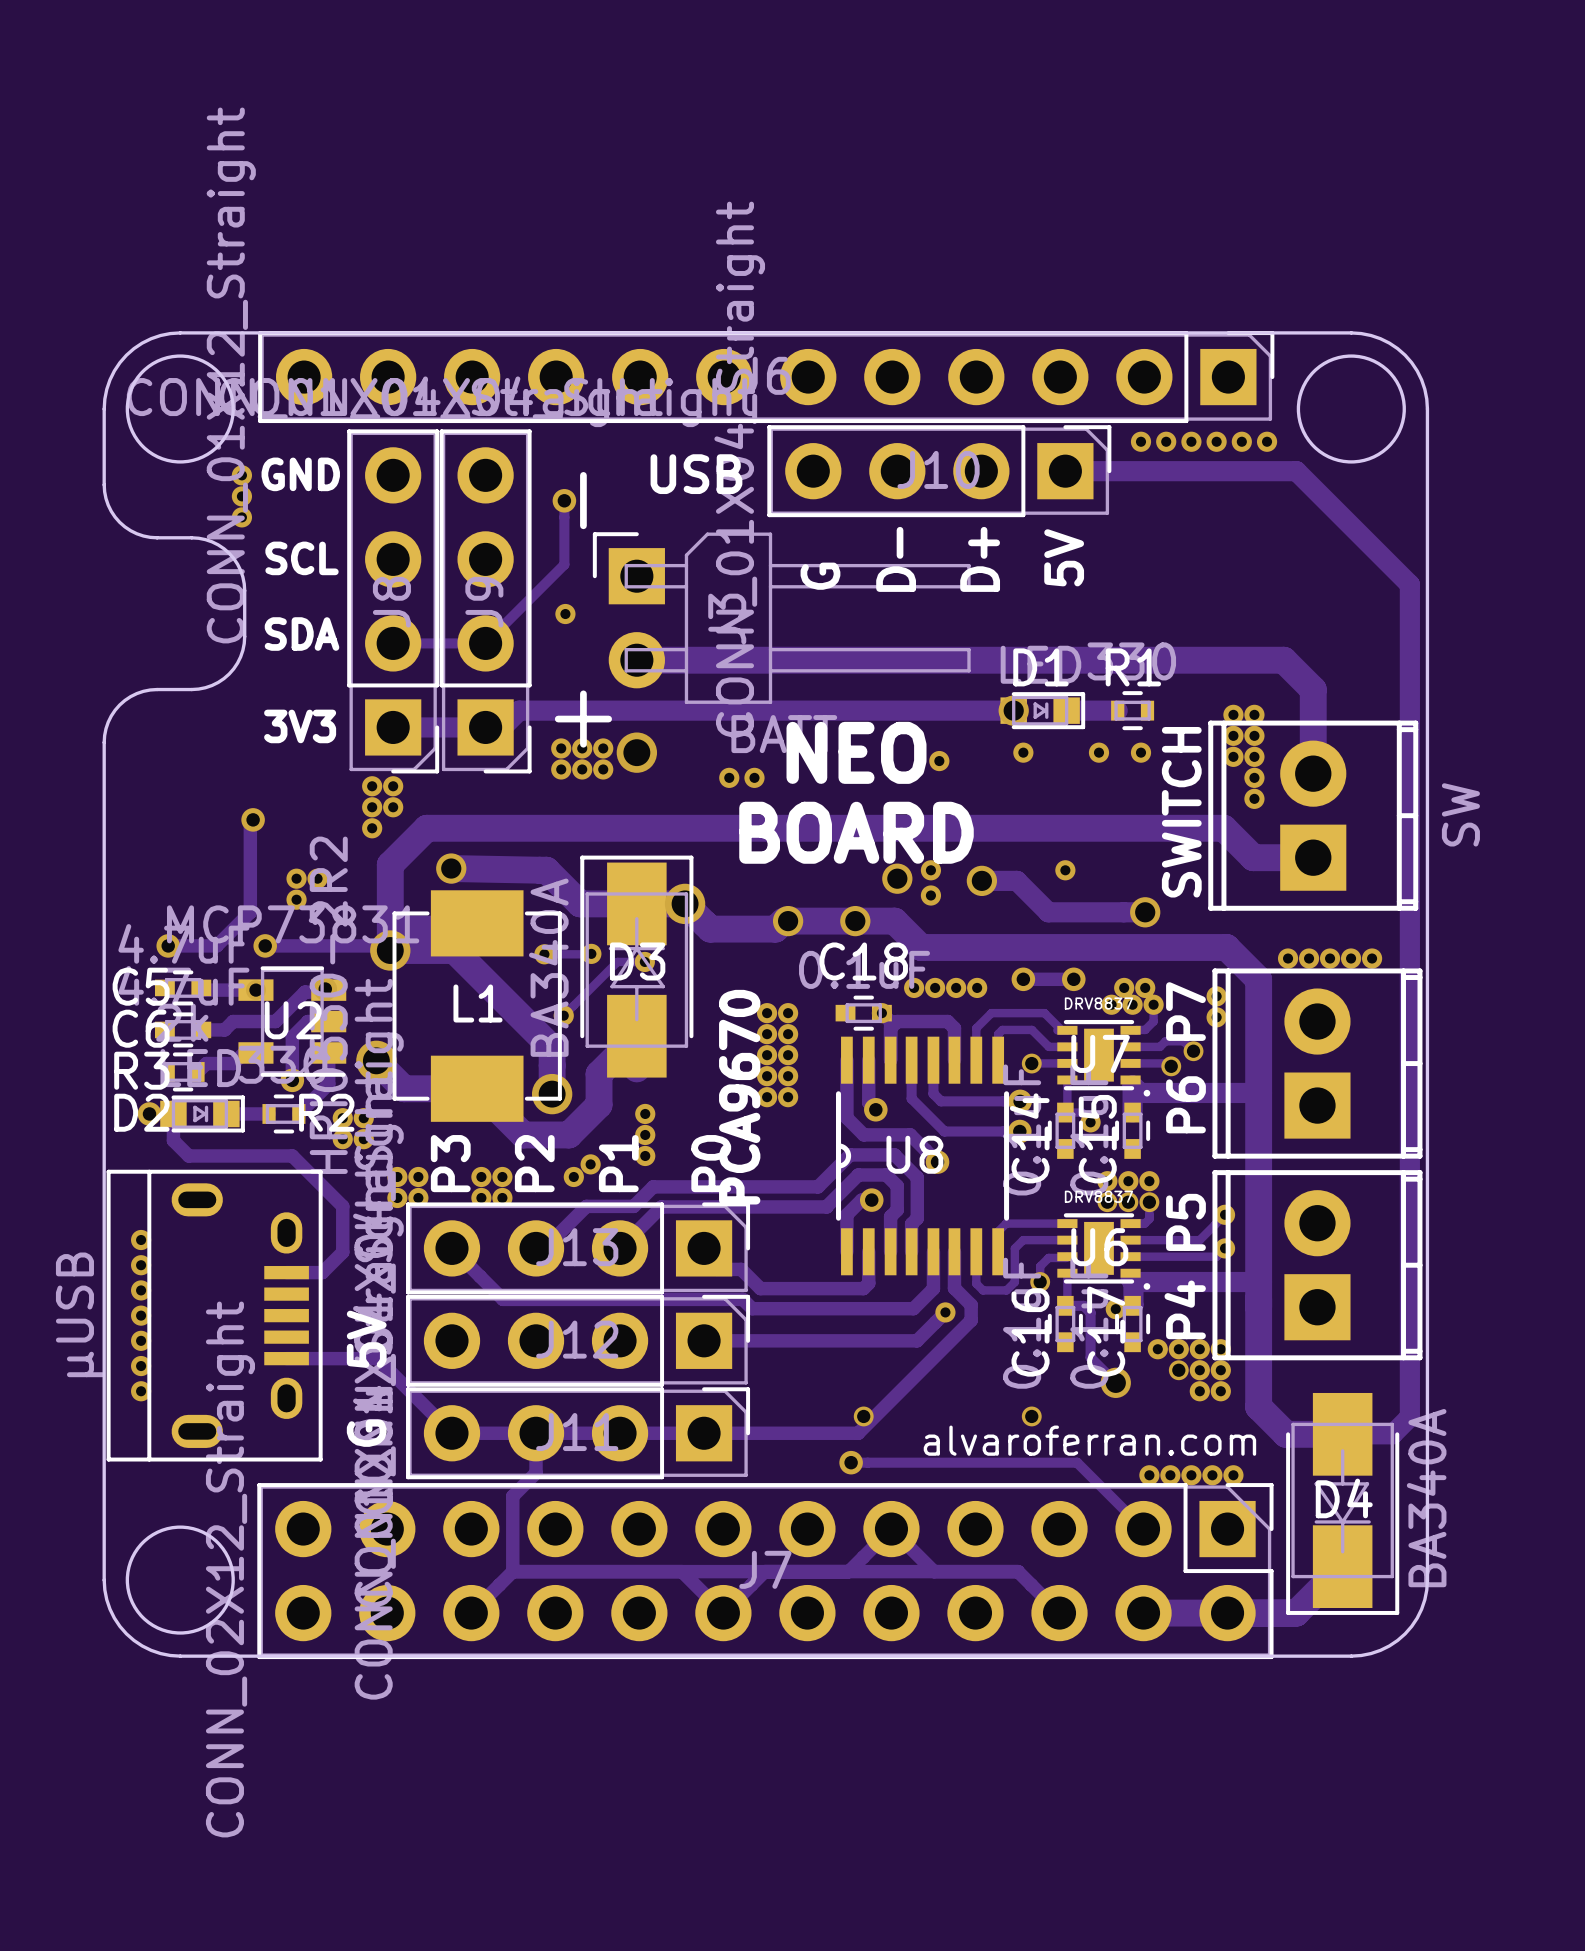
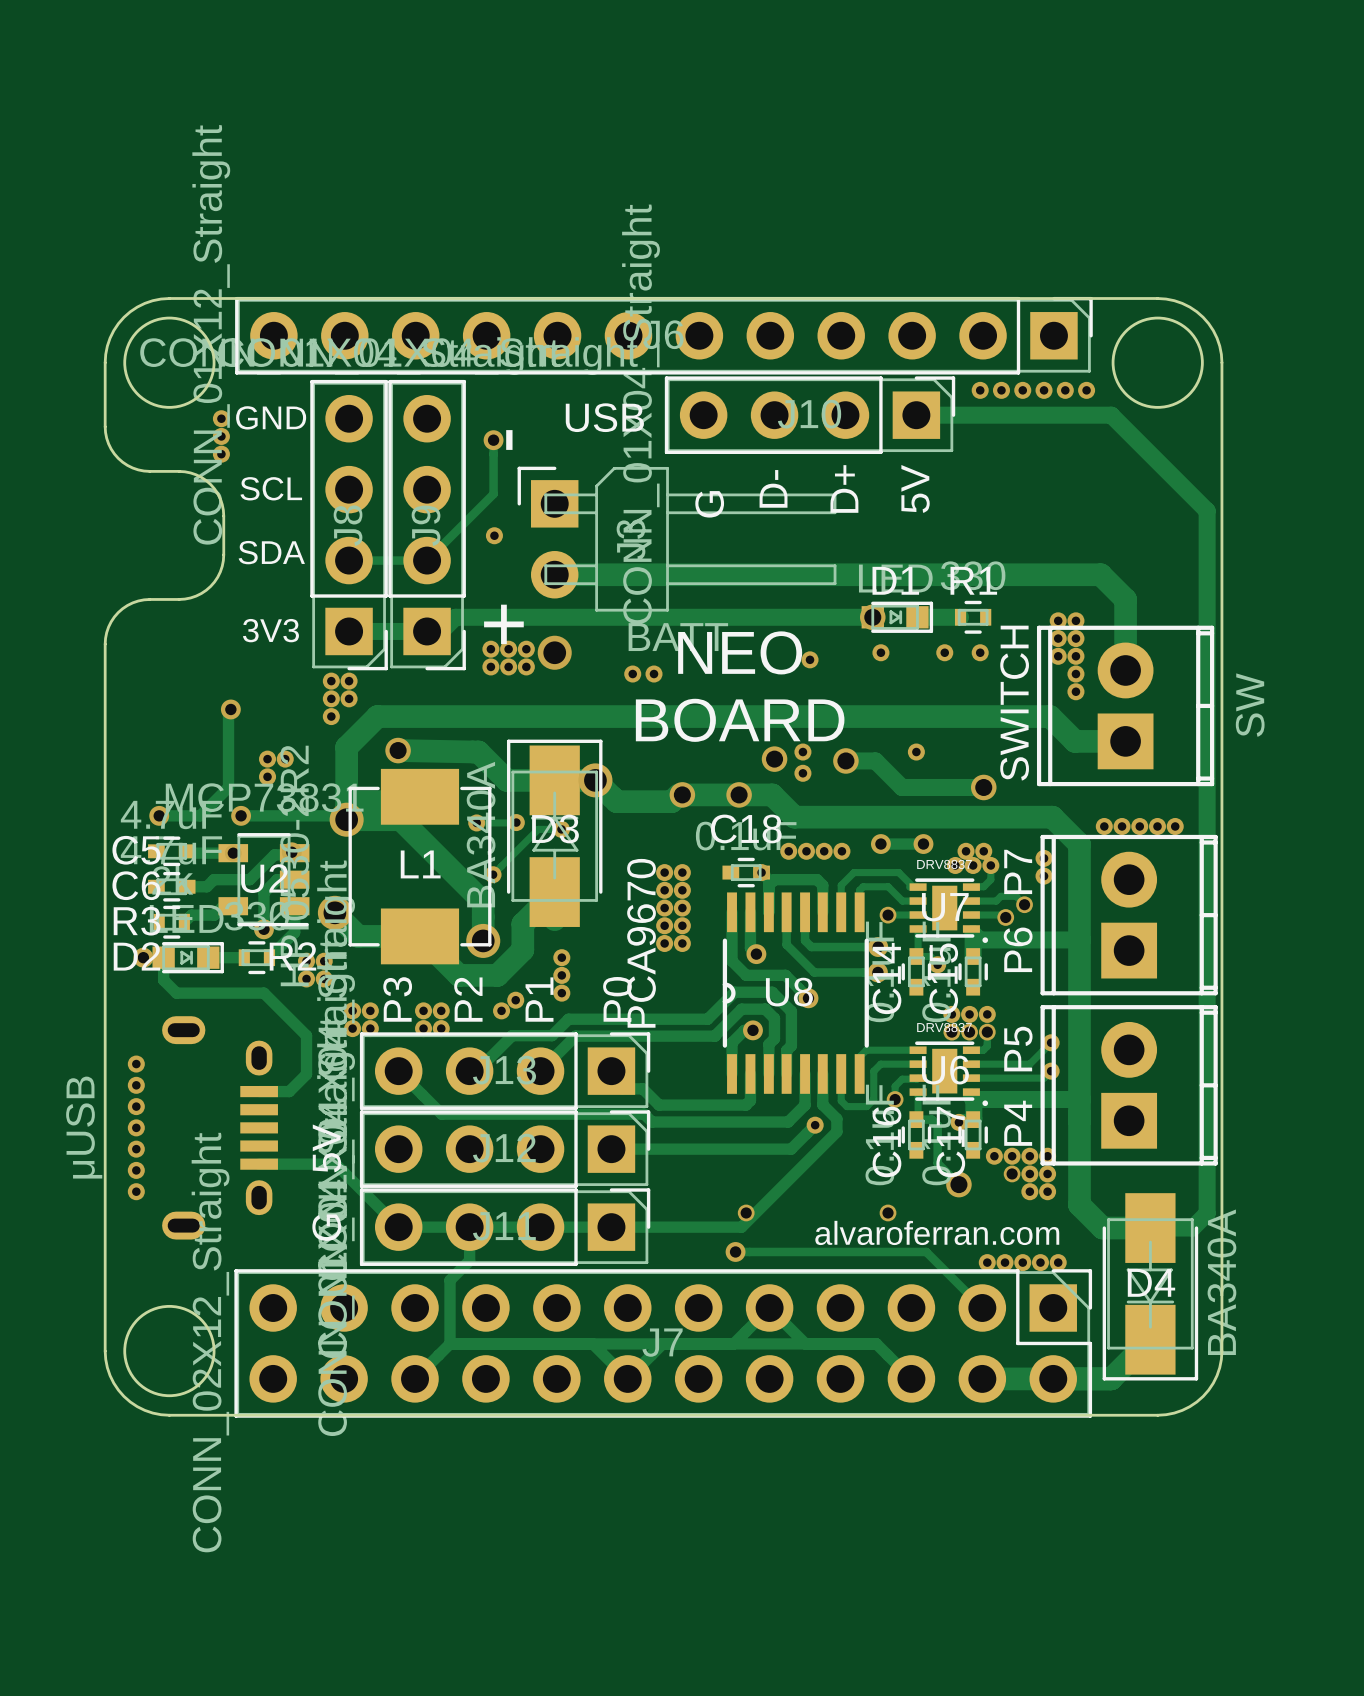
part footprint: [106, 1169, 323, 1462] -> [162, 1016, 278, 1240]

